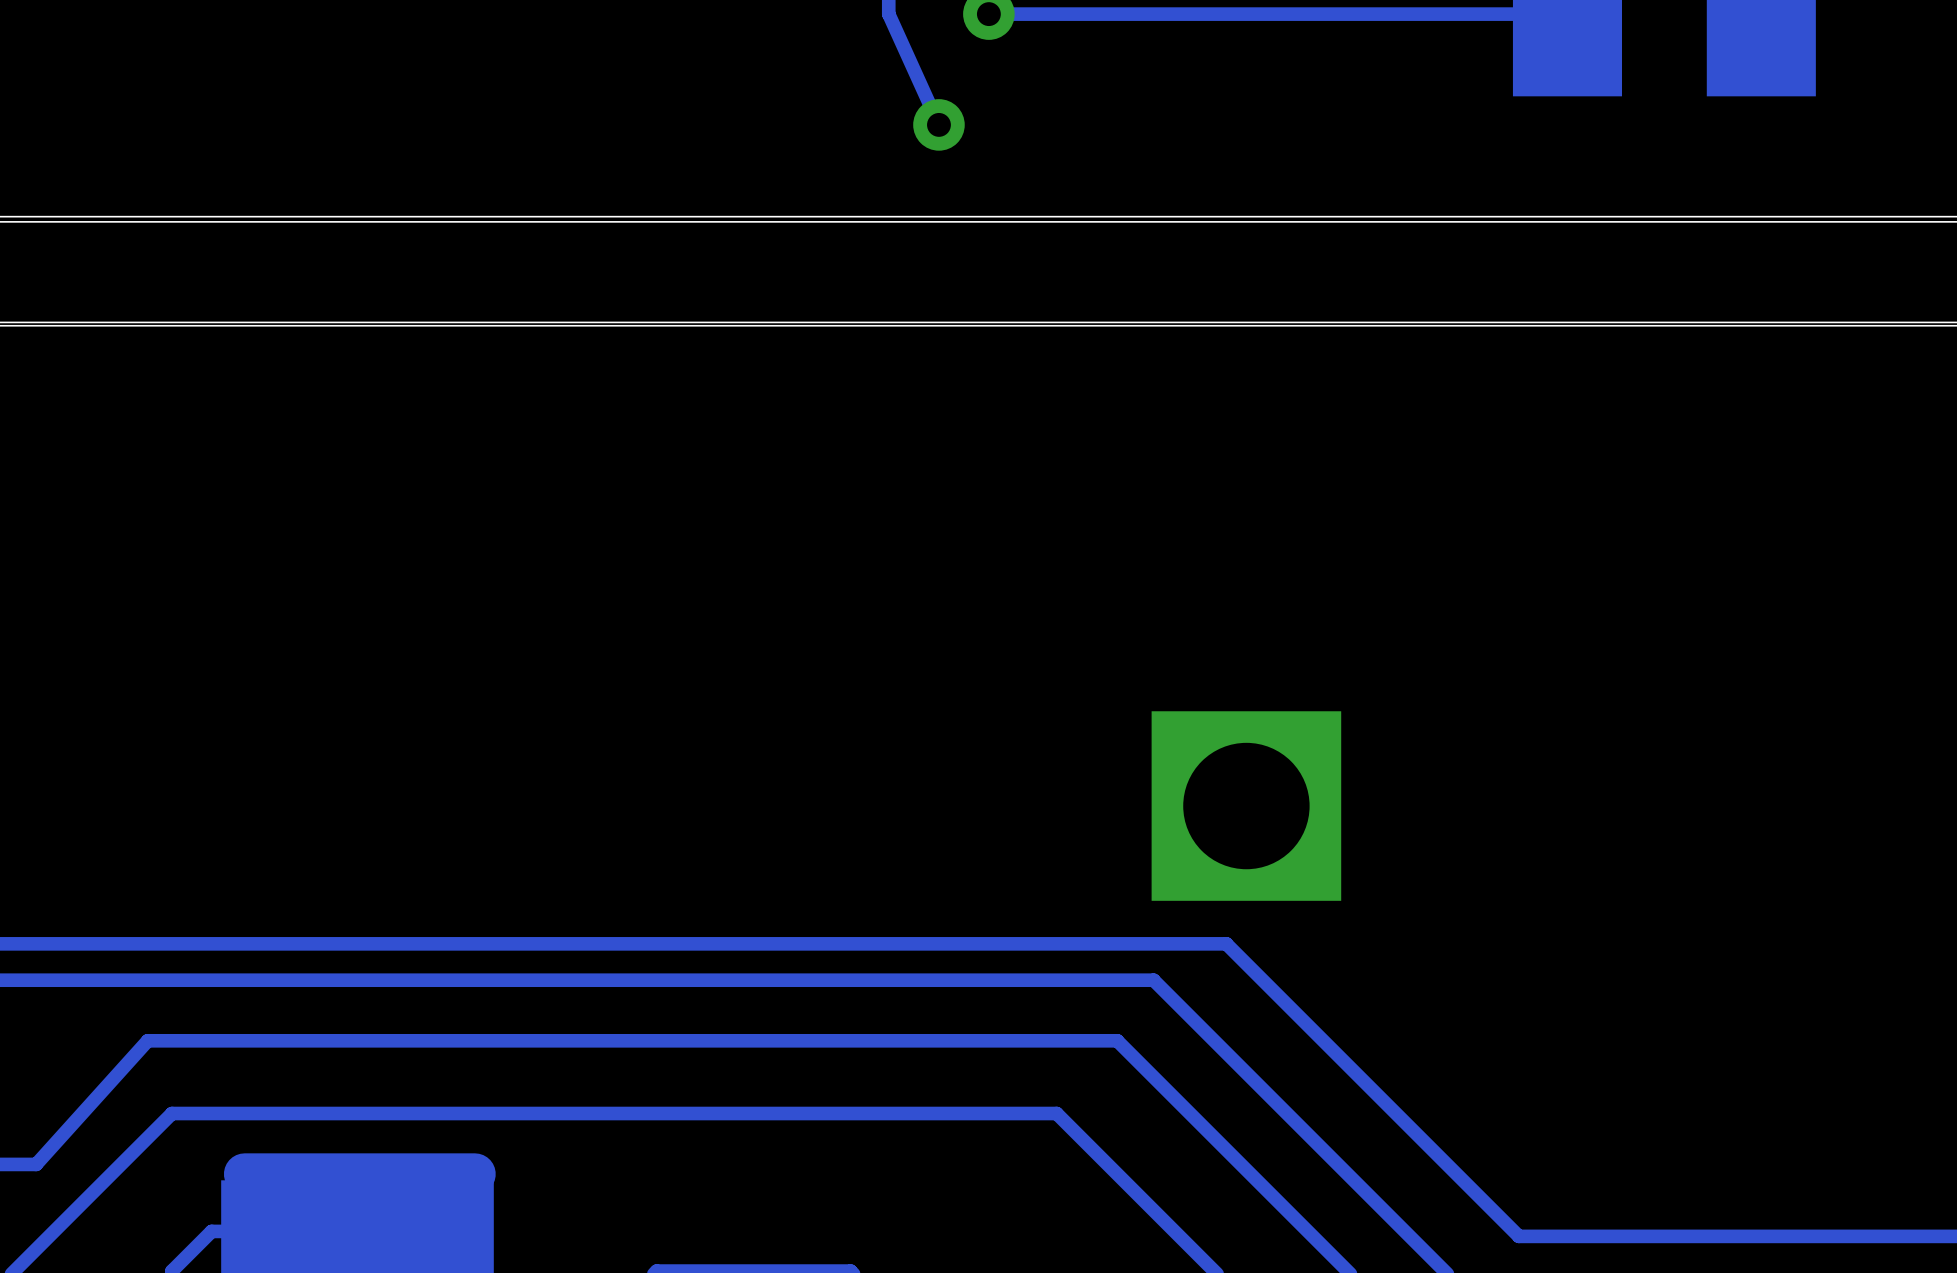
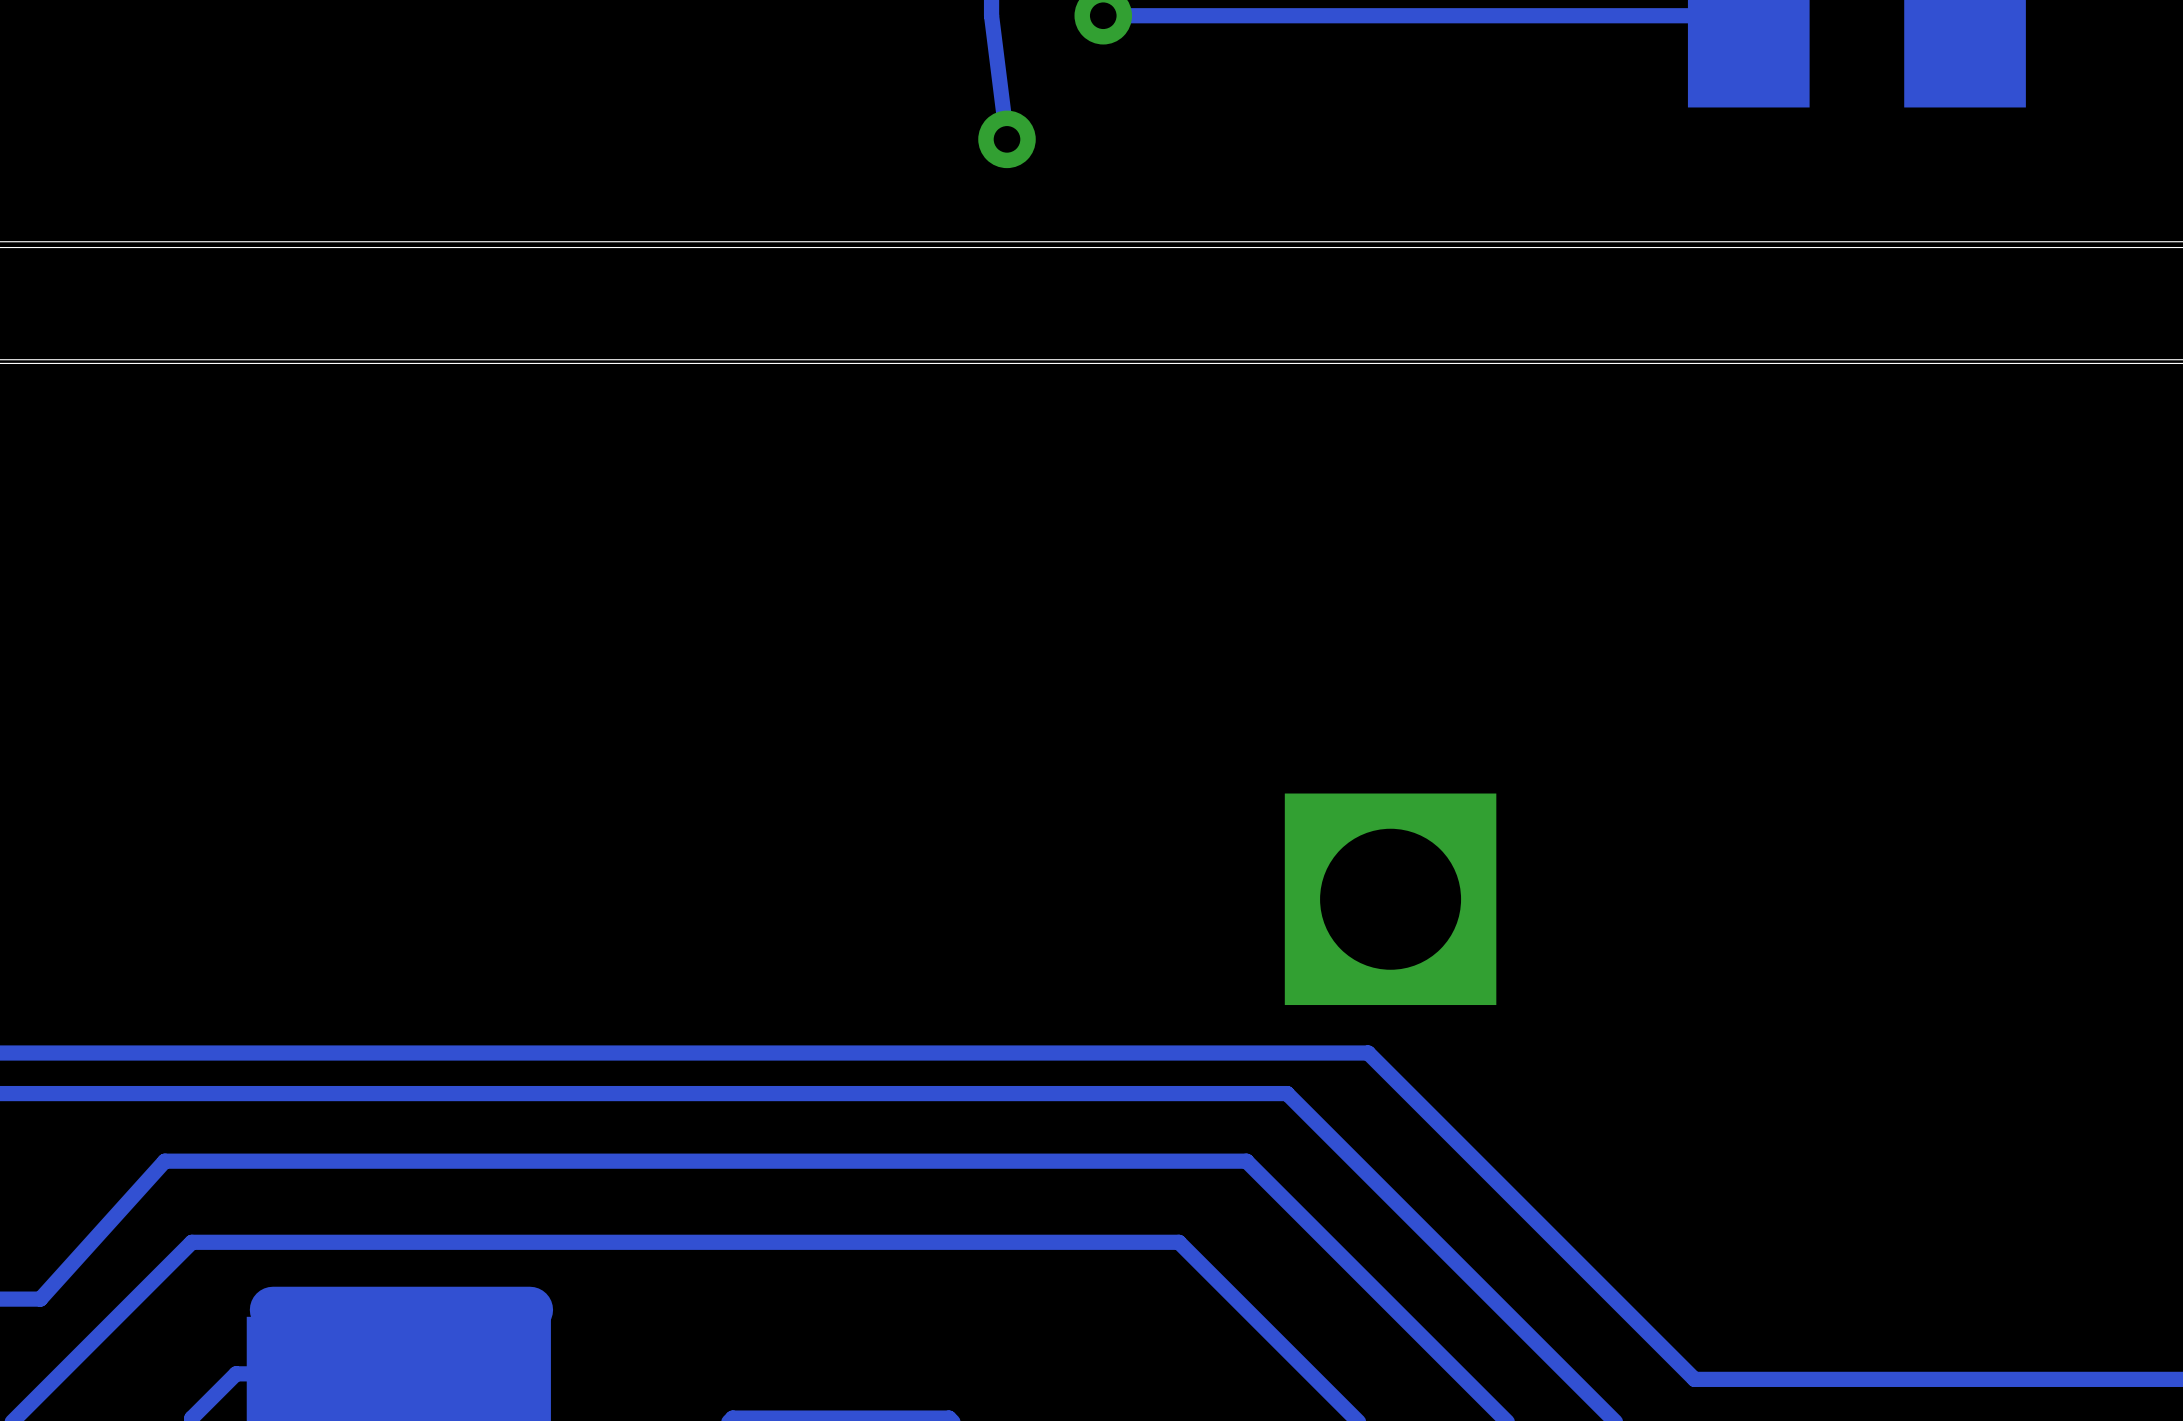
track: (888, 14) (938, 124) -> (991, 15) (1007, 139)
via position: (938, 124) -> (1007, 139)

